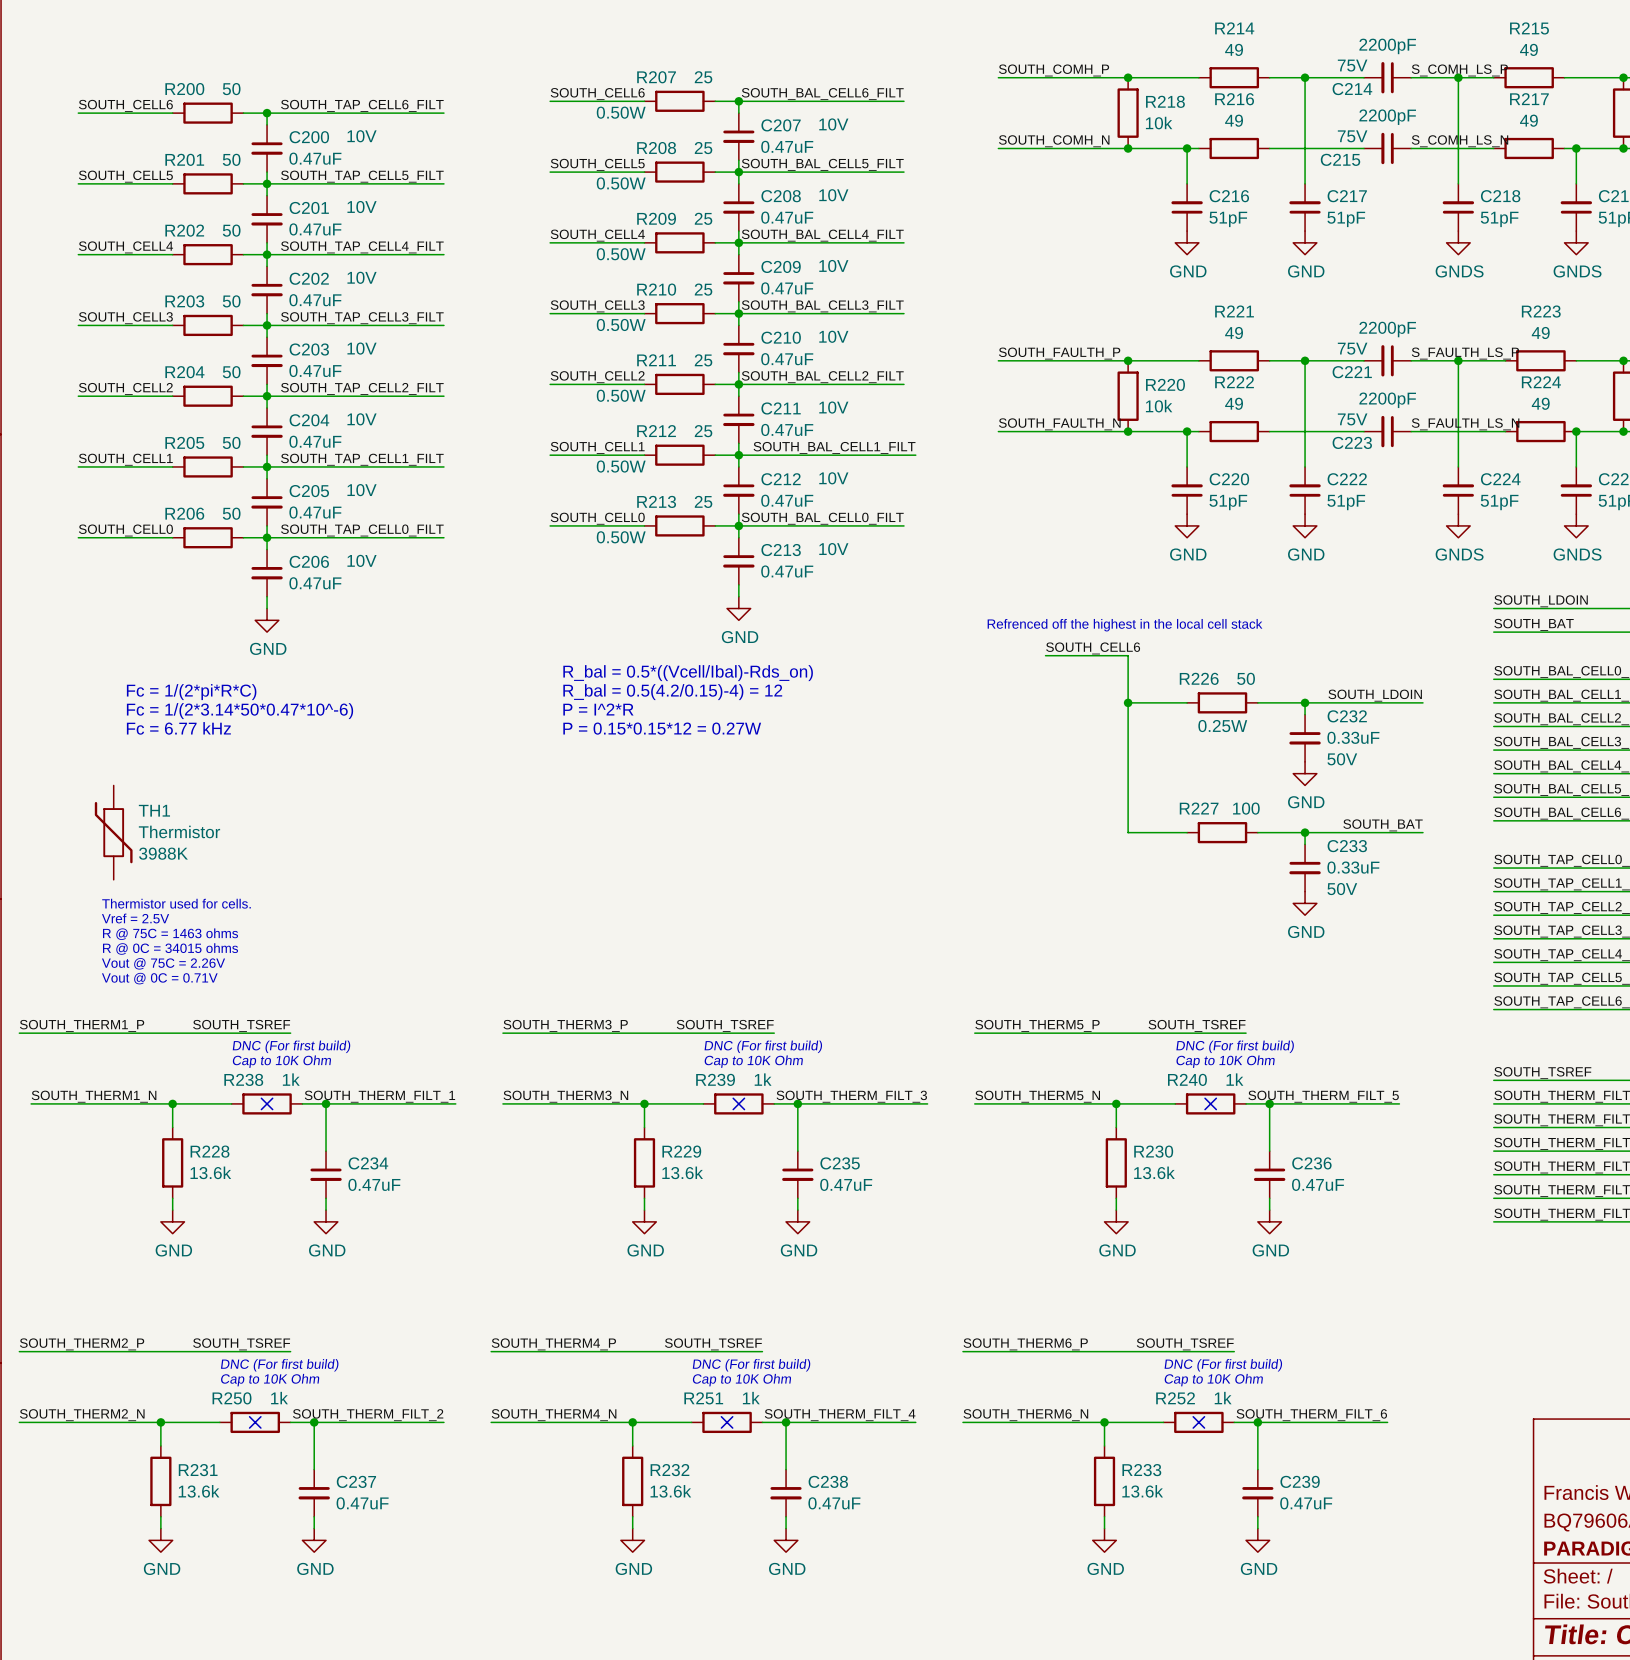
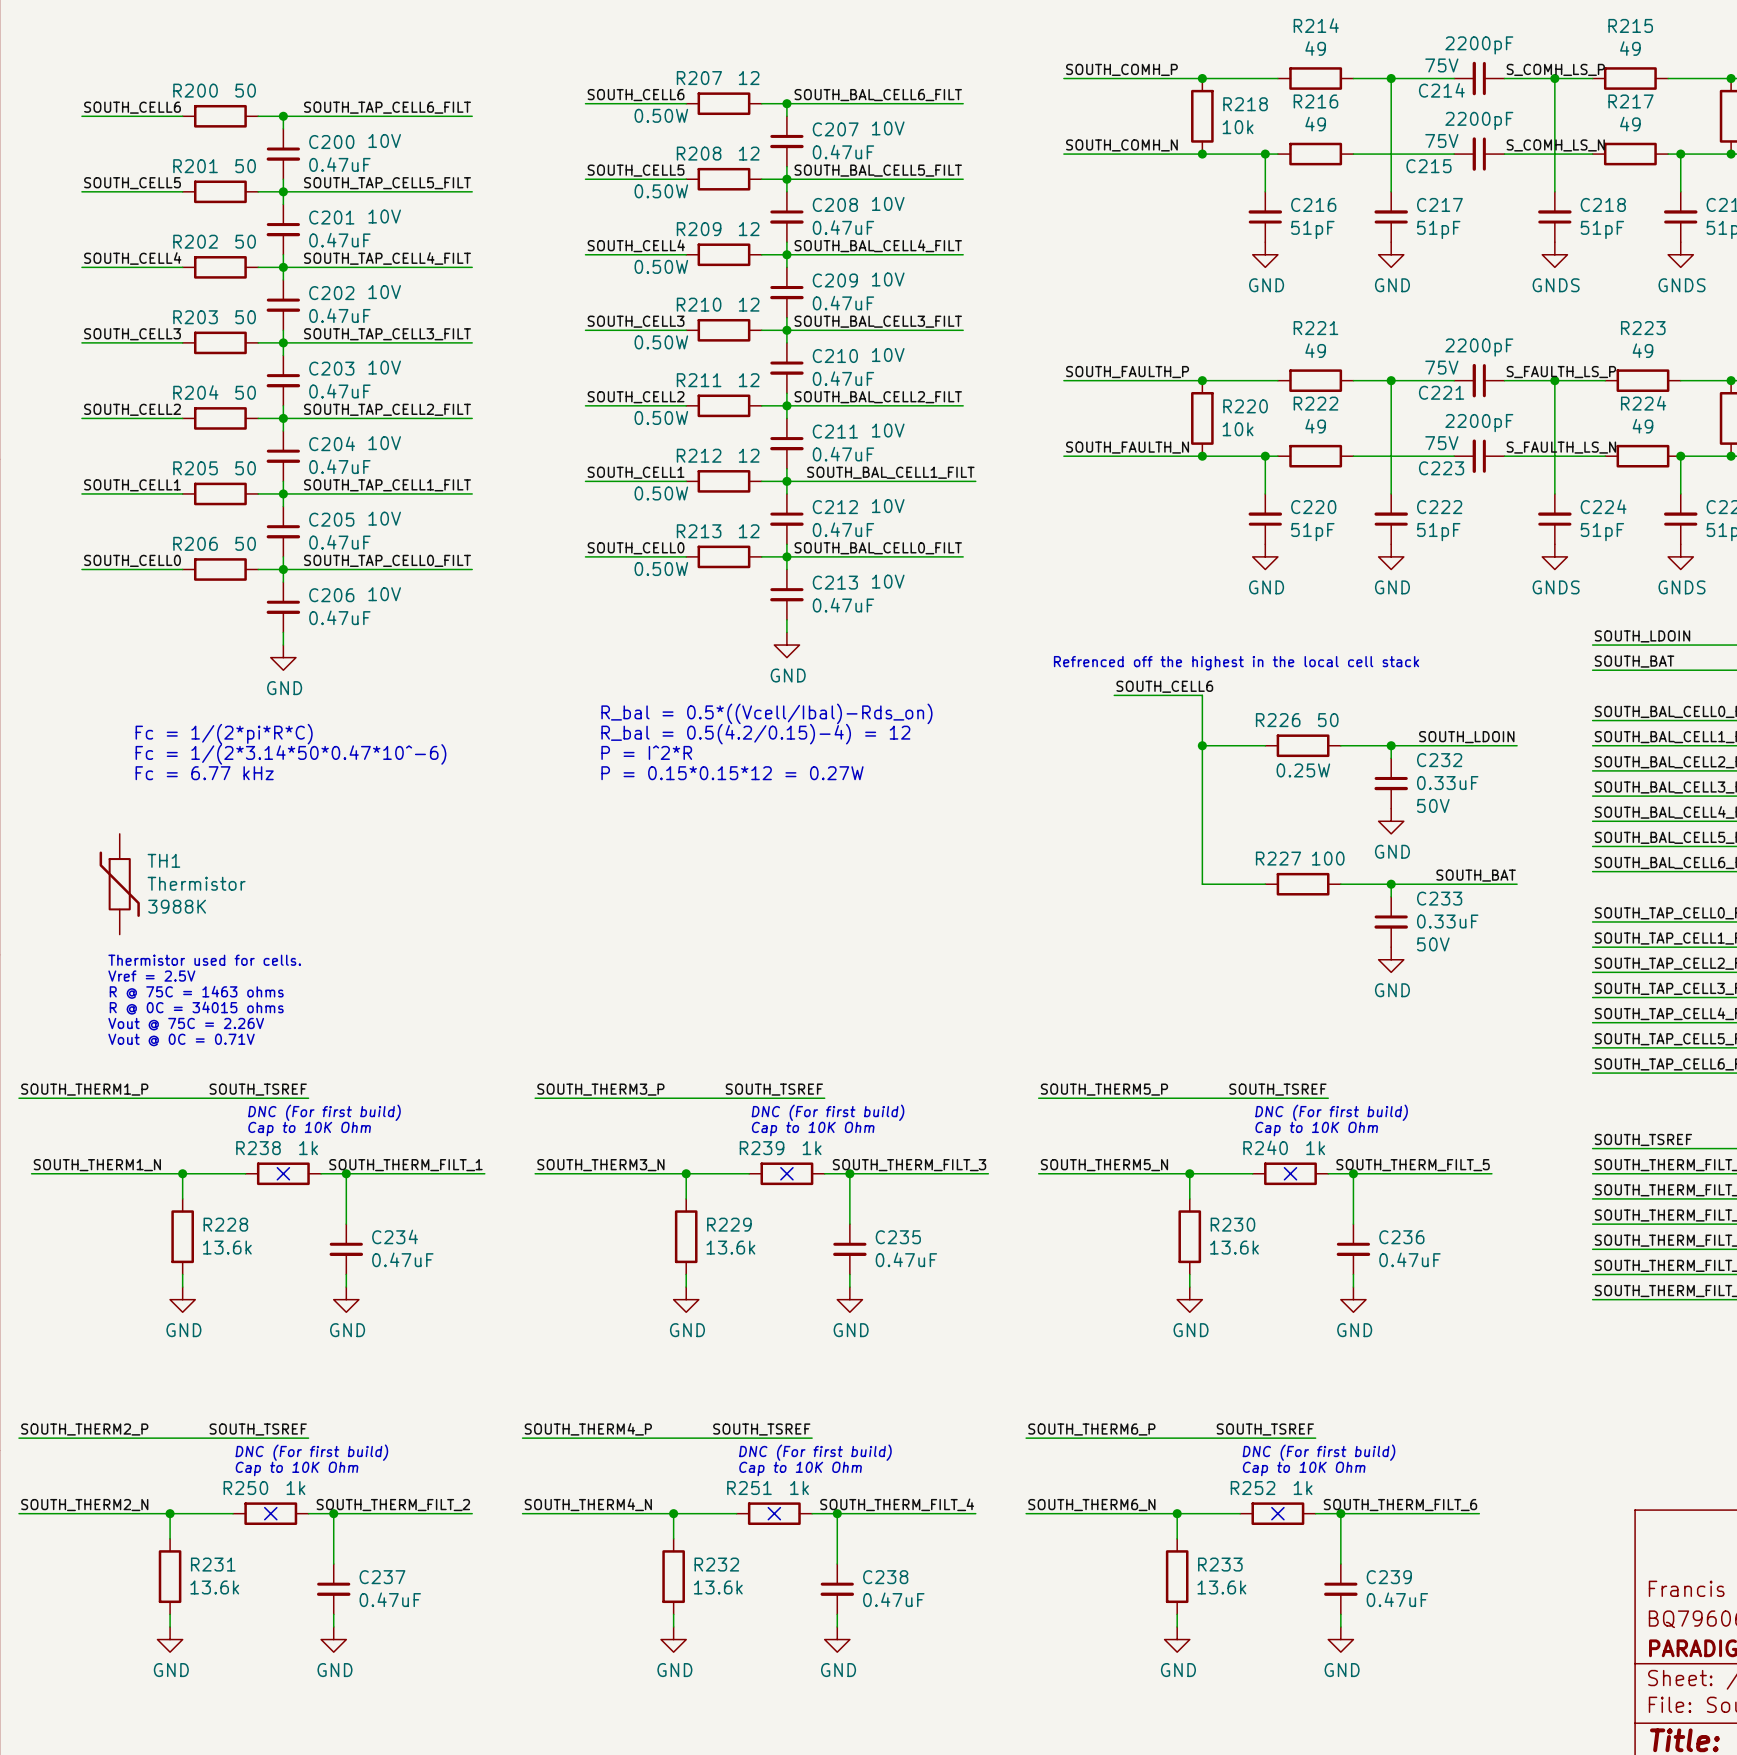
R207 value: 25 (703, 77) -> 12 (749, 78)
R208 value: 25 (703, 148) -> 12 (749, 153)
R209 value: 25 (703, 218) -> 12 (749, 229)
R210 value: 25 (703, 289) -> 12 (749, 304)
R211 value: 25 (703, 360) -> 12 (749, 380)
R212 value: 25 (703, 431) -> 12 (749, 455)
R213 value: 25 (703, 501) -> 12 (749, 531)

